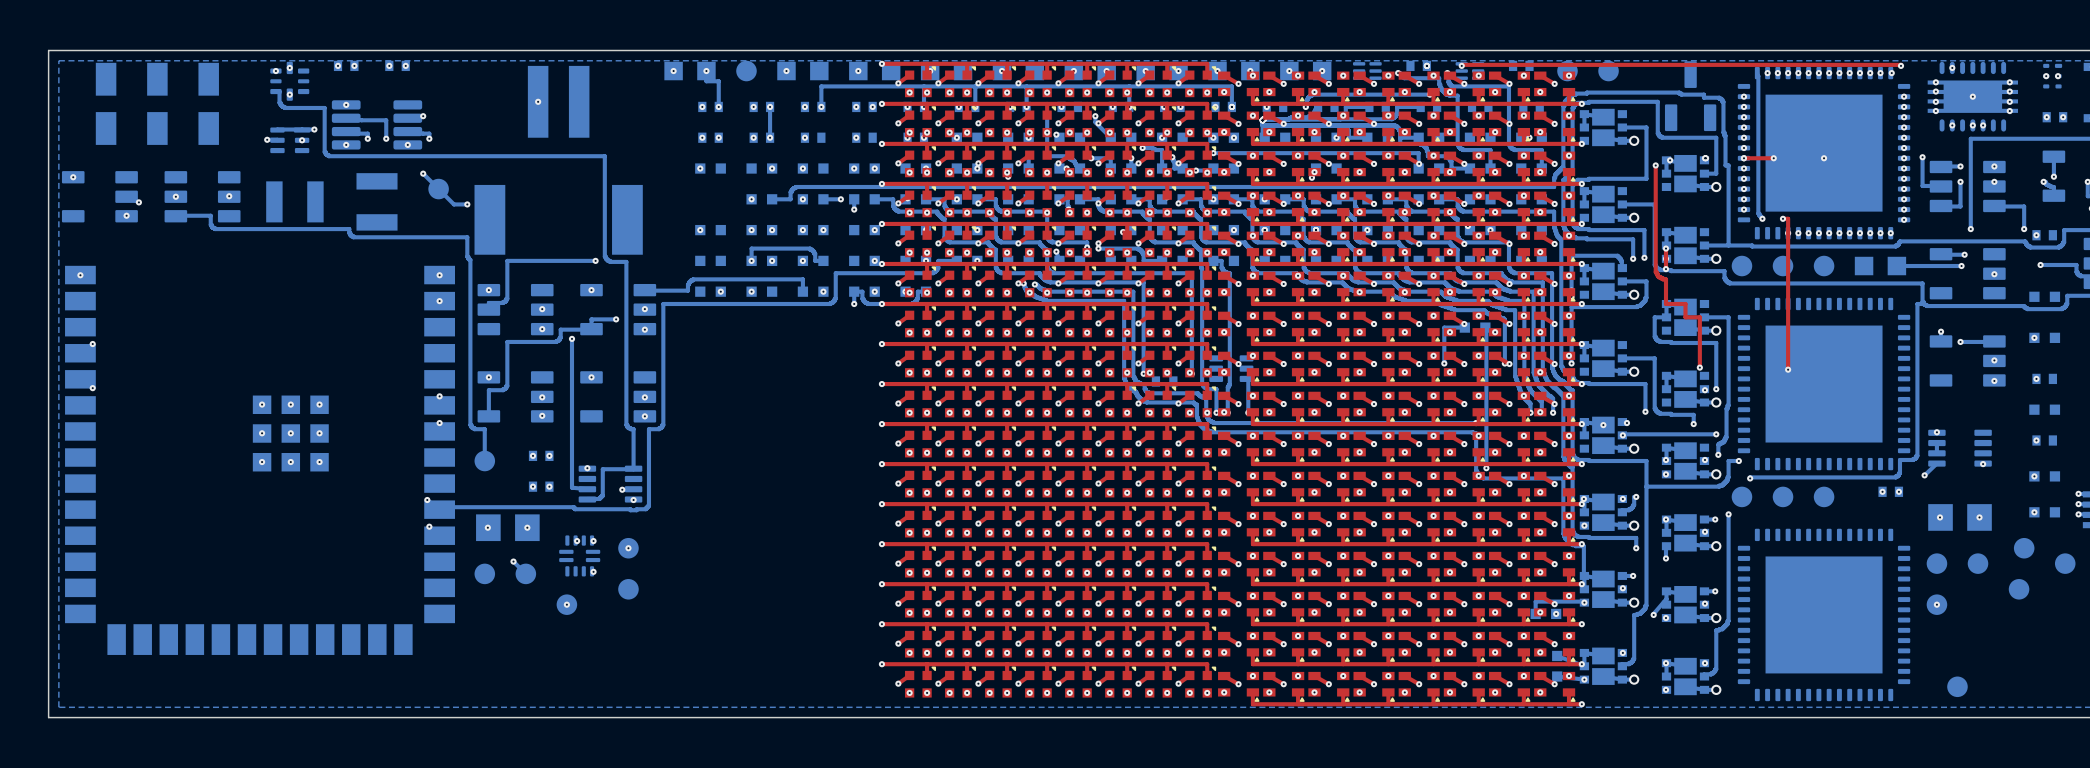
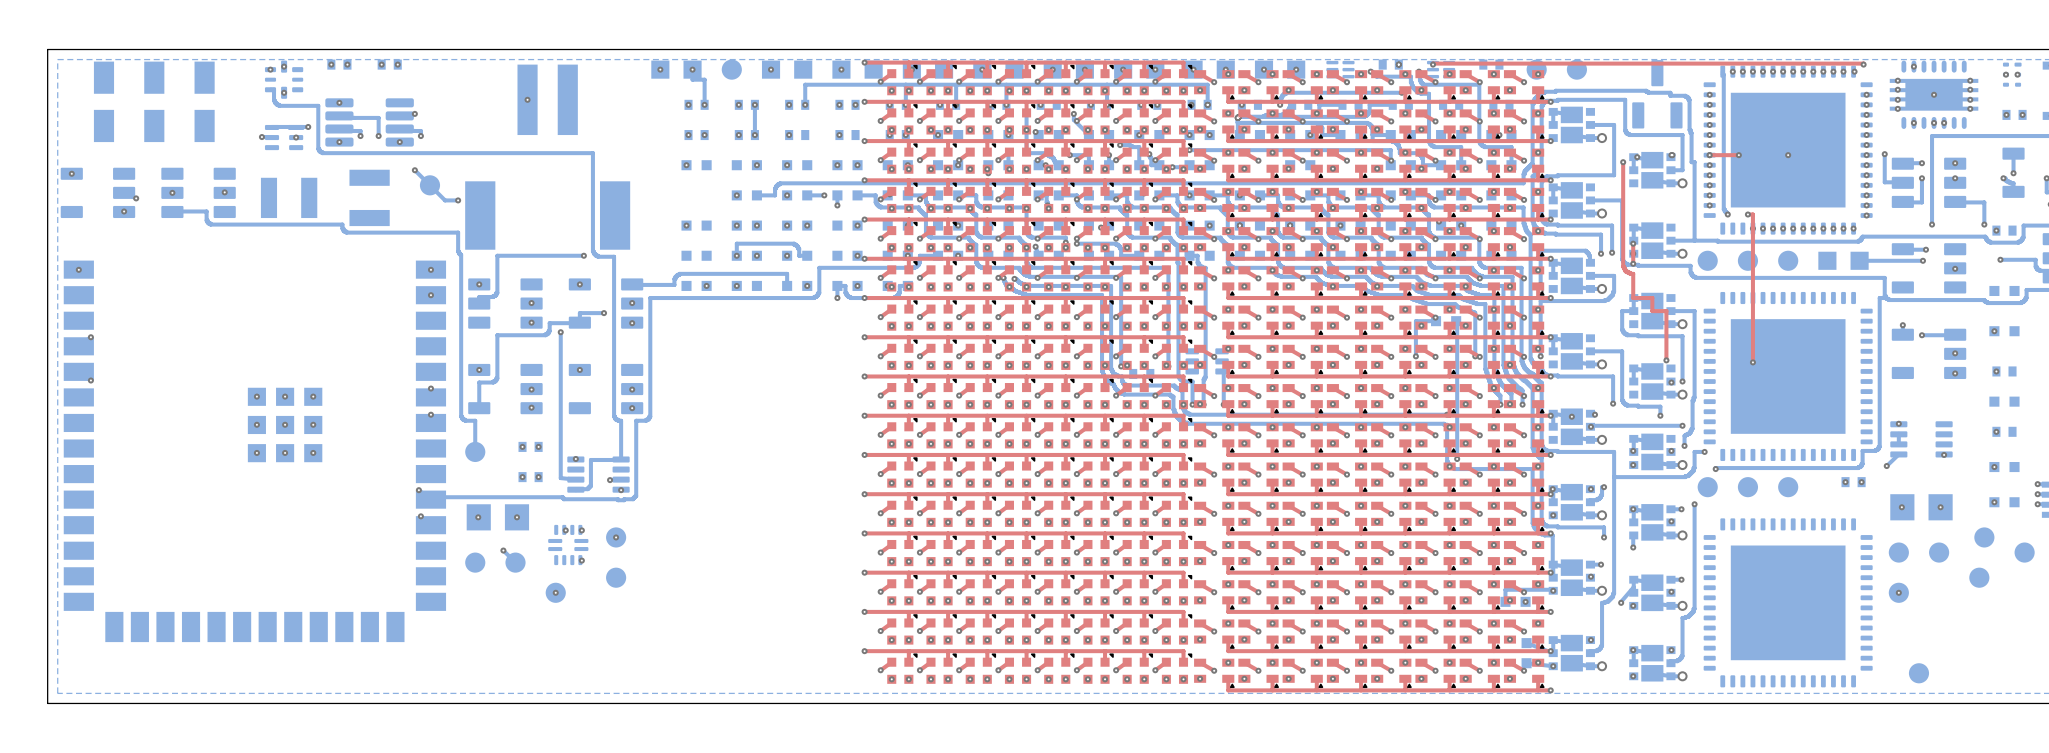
via: (1311, 177) -> none
via: (956, 199) -> none

